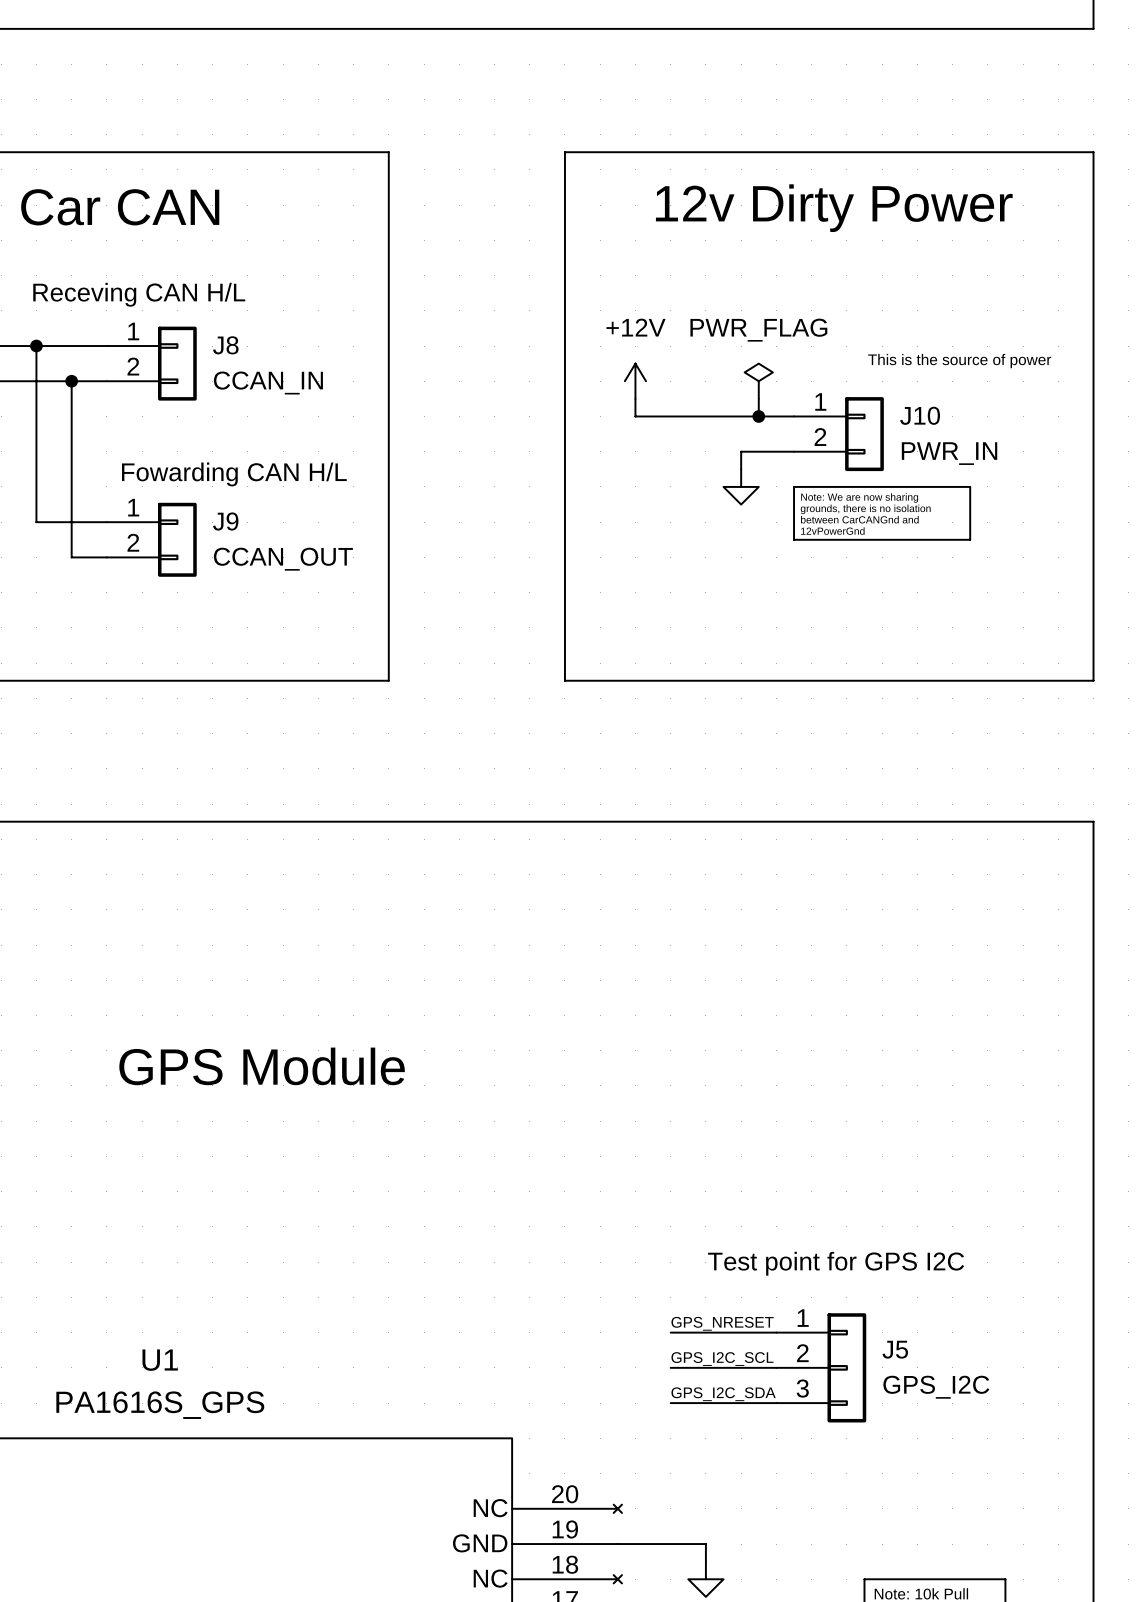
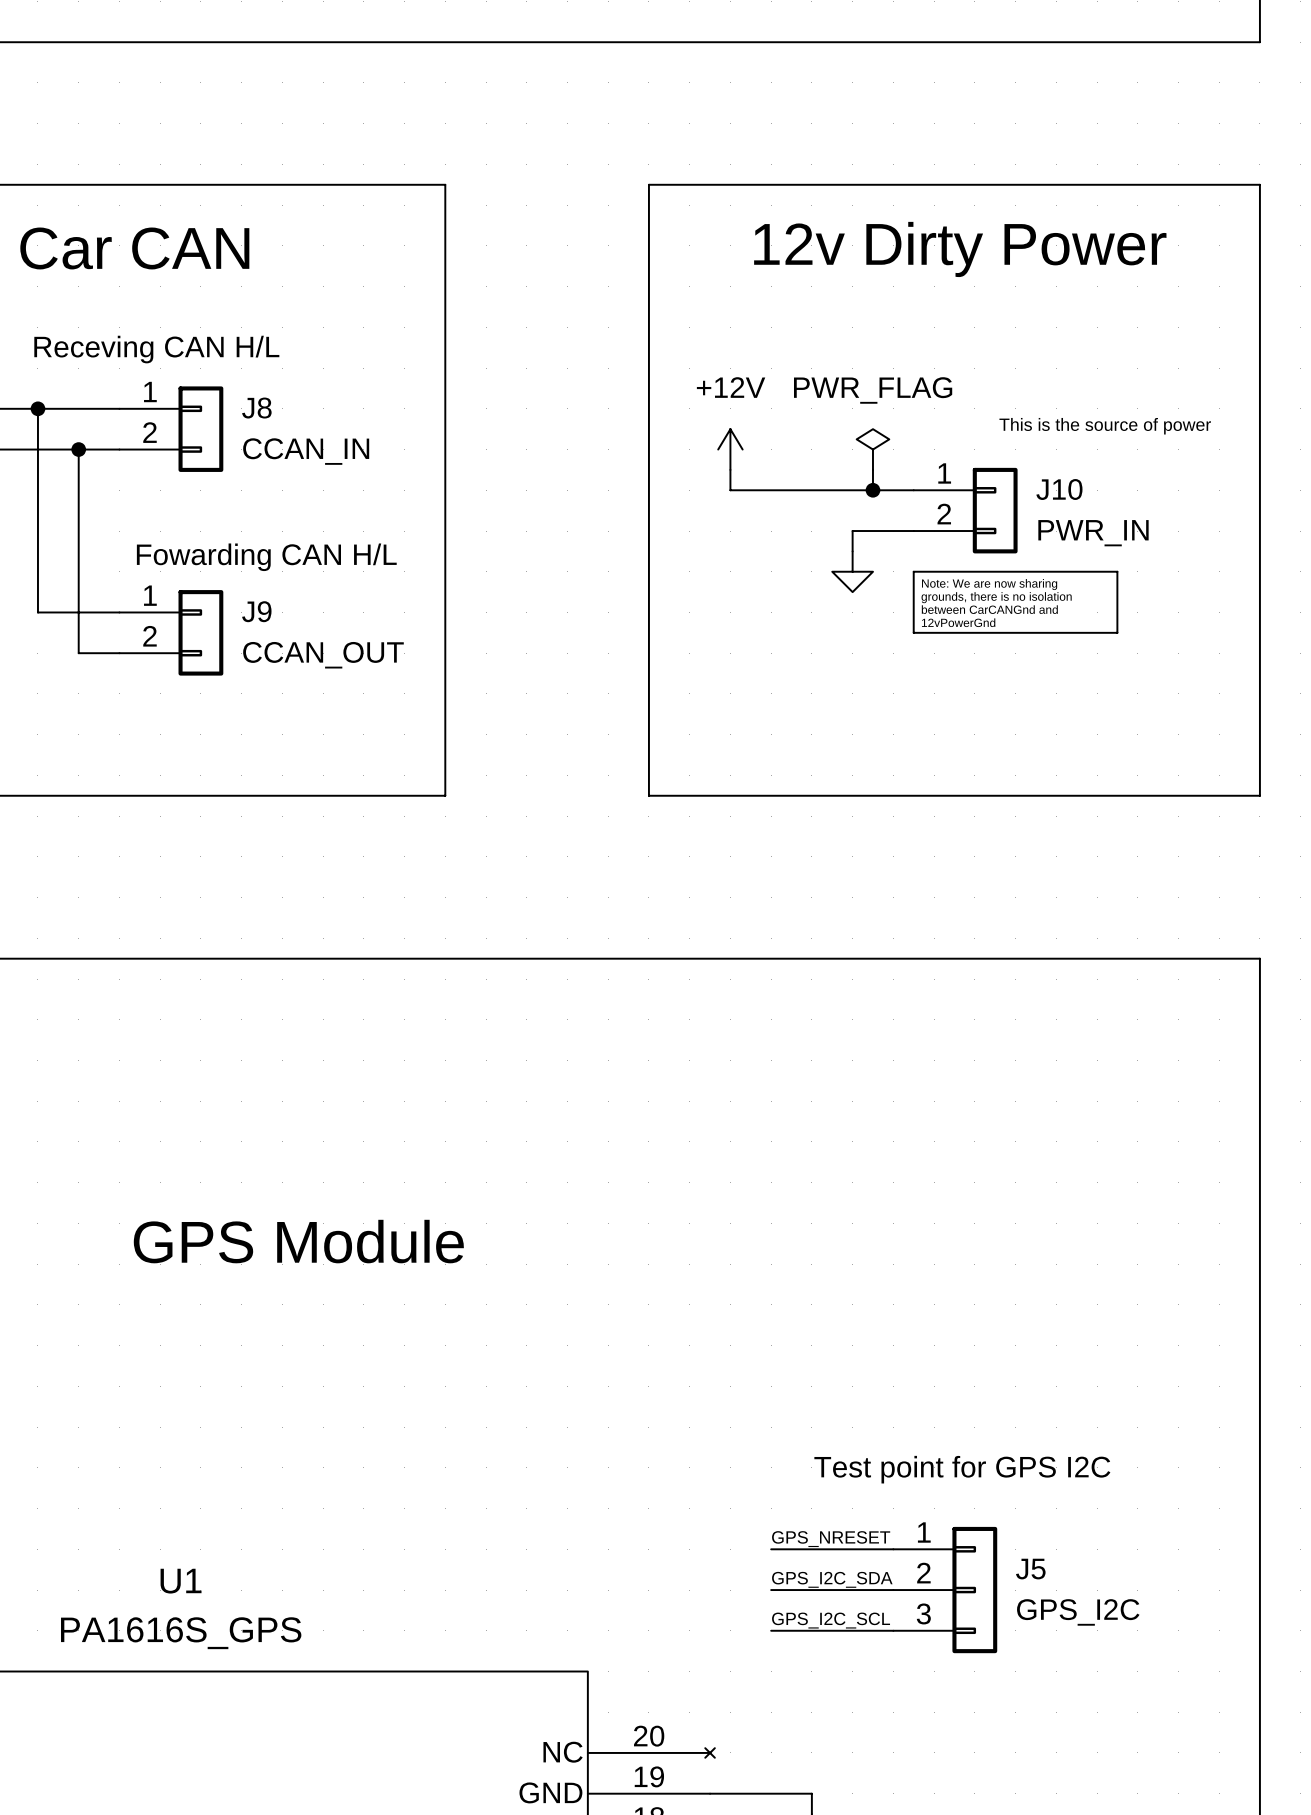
label: GPS_I2C_SCL (722, 1359) -> GPS_I2C_SDA (832, 1579)
label: GPS_I2C_SDA (723, 1394) -> GPS_I2C_SCL (831, 1620)

